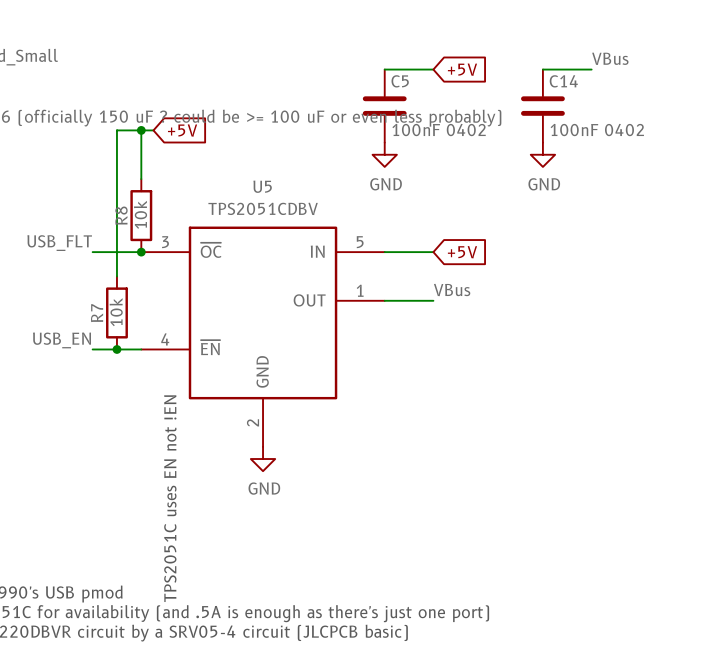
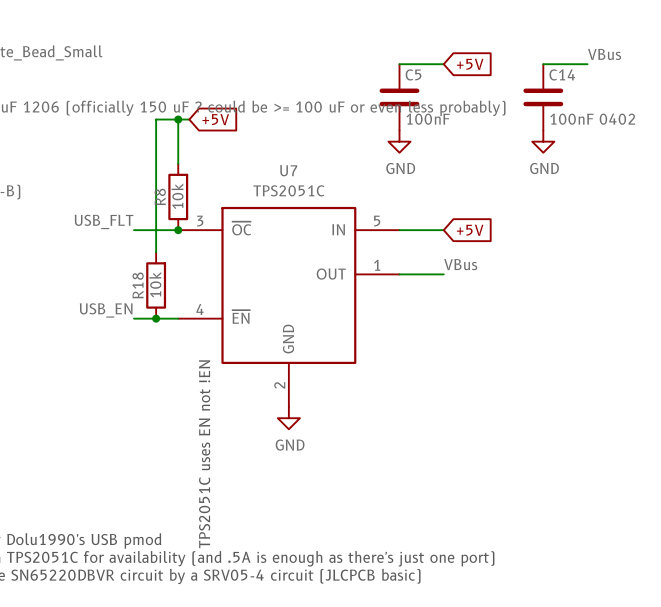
C5 value: 100nF 0402 (439, 130) -> 100nF (428, 119)
U5 name: U5 (262, 186) -> U7 (288, 170)
U5 value: TPS2051CDBV (263, 208) -> TPS2051C (288, 190)
R7 name: R7 (97, 313) -> R18 (138, 285)

